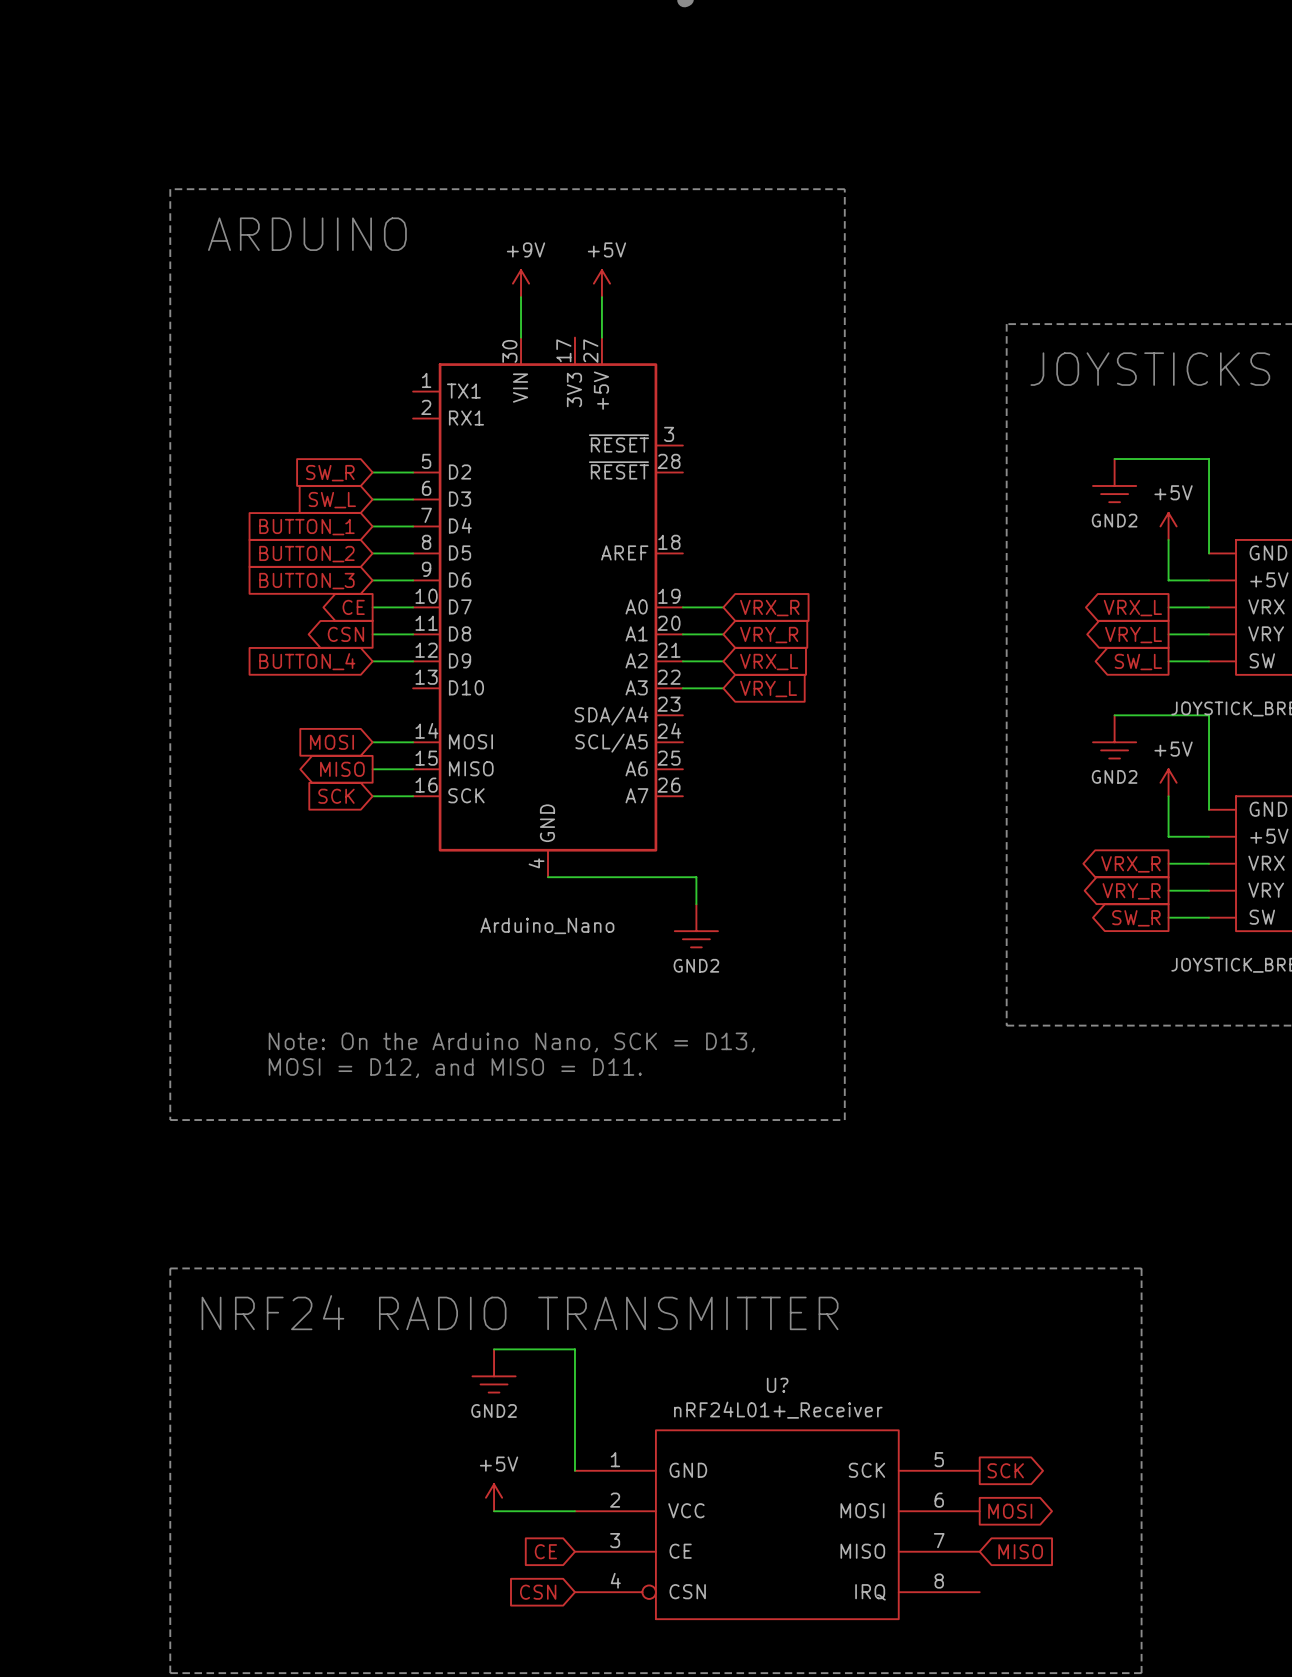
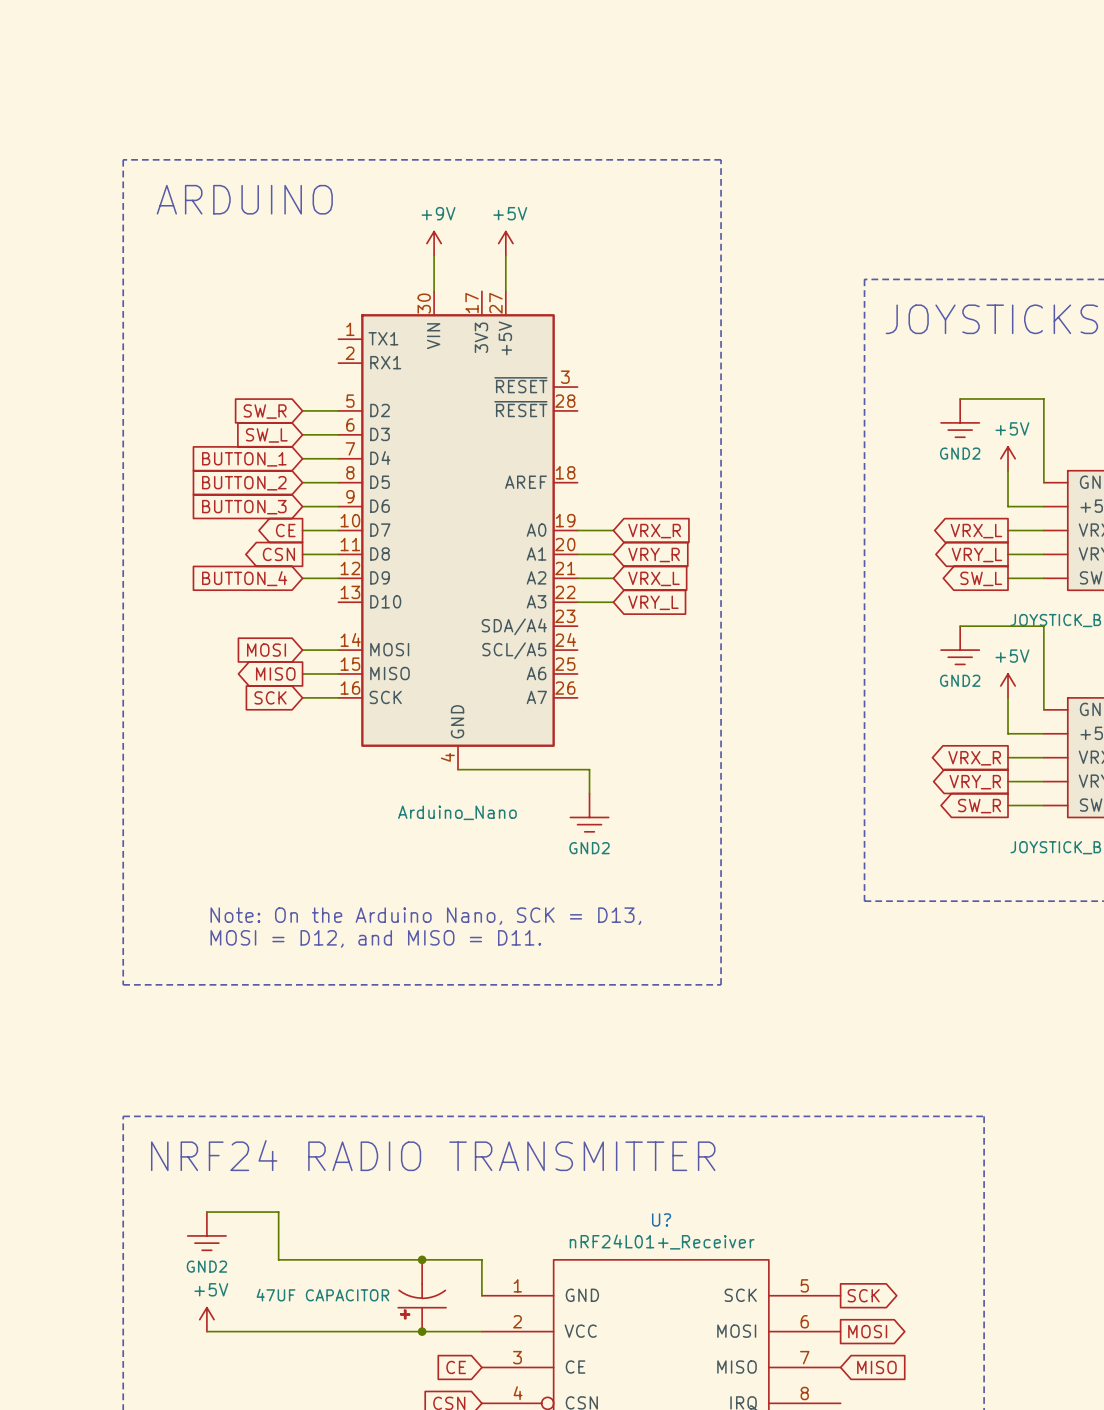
wire: (494, 1349) (574, 1349) (574, 1430) -> (206, 1212) (278, 1212) (278, 1259) (481, 1259)
power symbol position: GND2 (494, 1370) -> GND2 (206, 1231)
junction: none -> (422, 1259)
part: none -> 47UF CAPACITOR (422, 1295)
power symbol position: +5V (494, 1497) -> +5V (206, 1319)
wire: none -> (206, 1331) (410, 1331)
junction: none -> (422, 1331)

